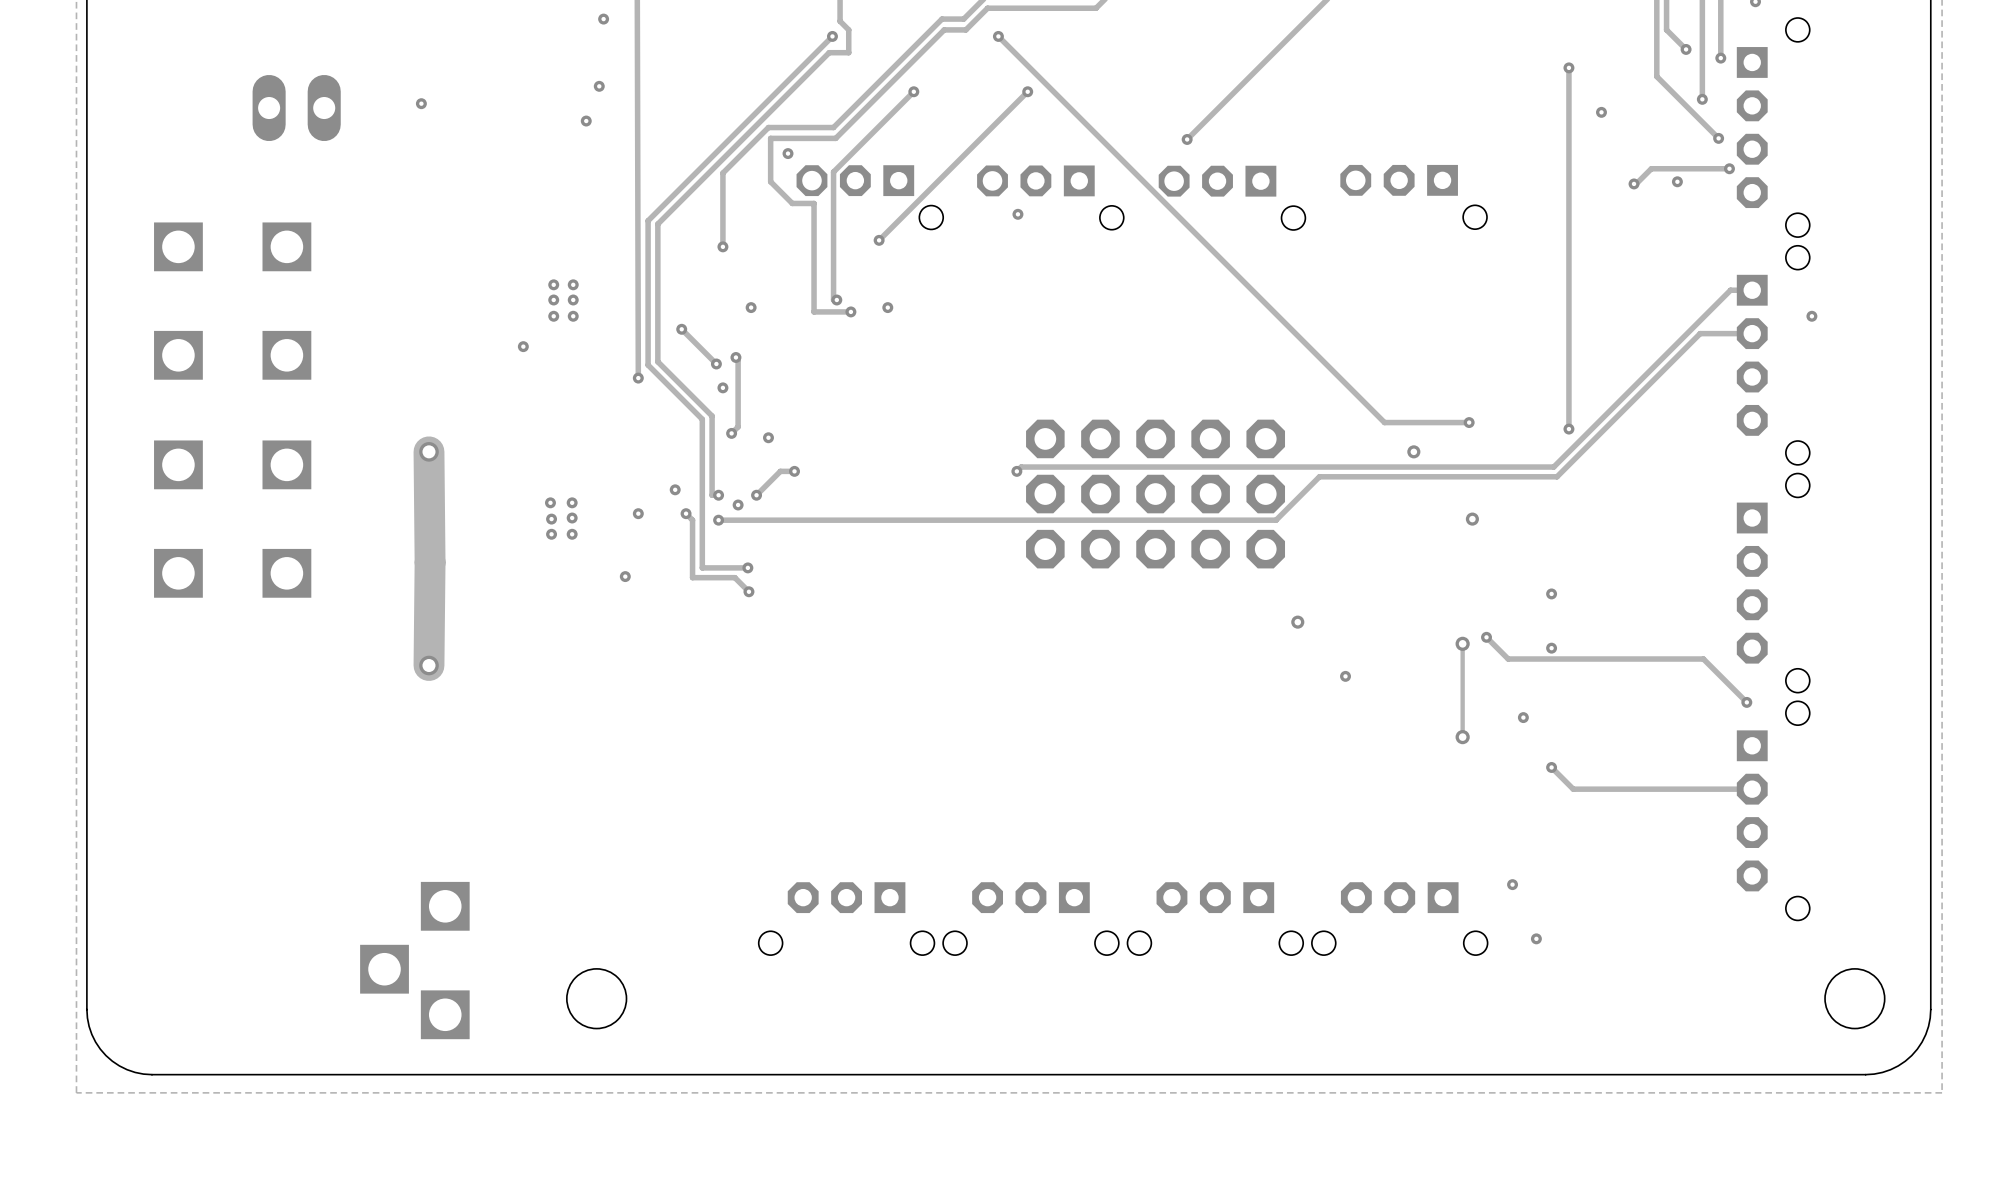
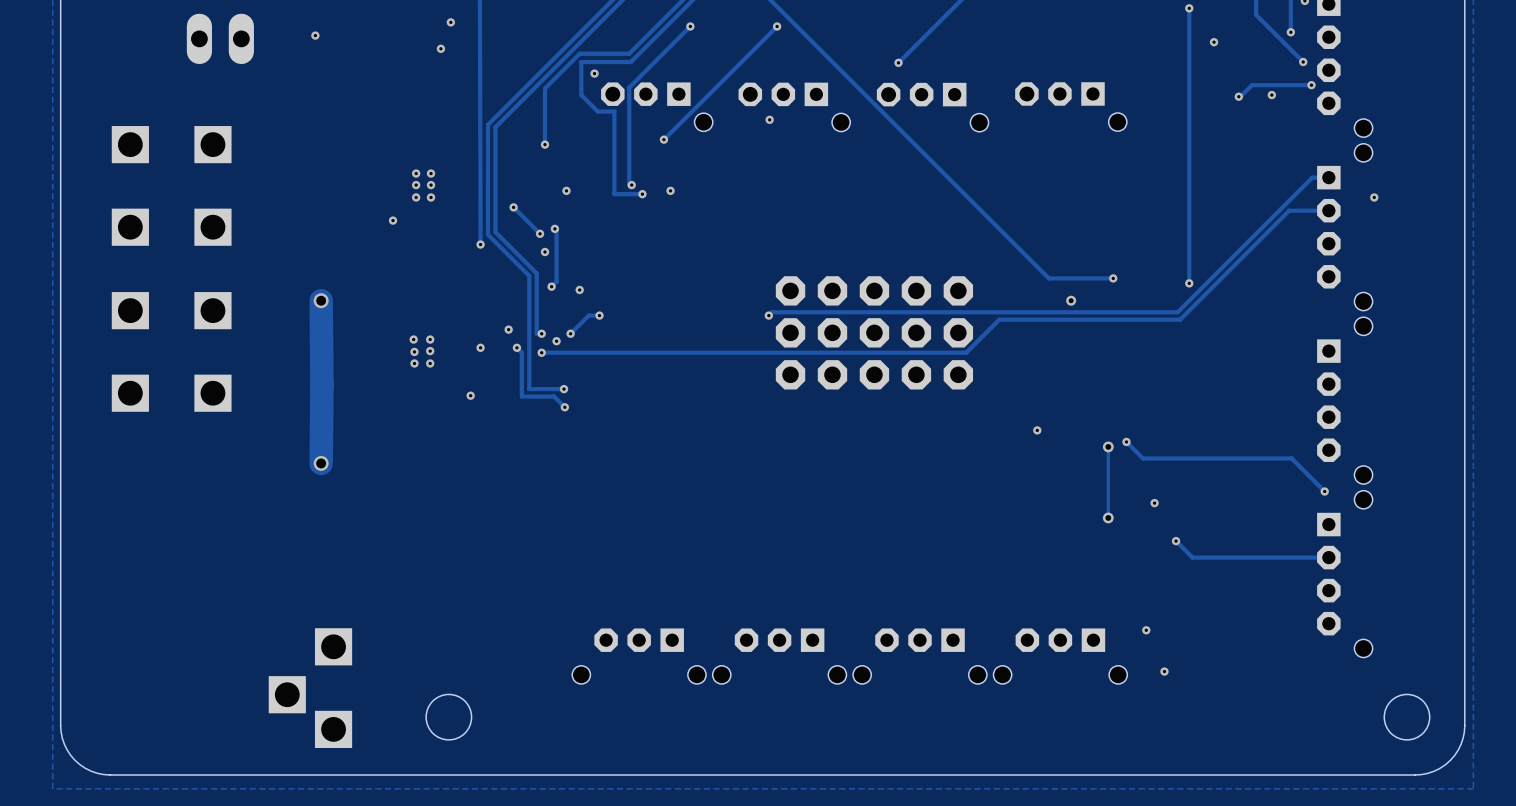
via: (1472, 519) -> none
via: (1551, 593) -> none
via: (1297, 622) -> none
via: (1551, 648) -> none
via position: (1345, 676) -> (1037, 430)

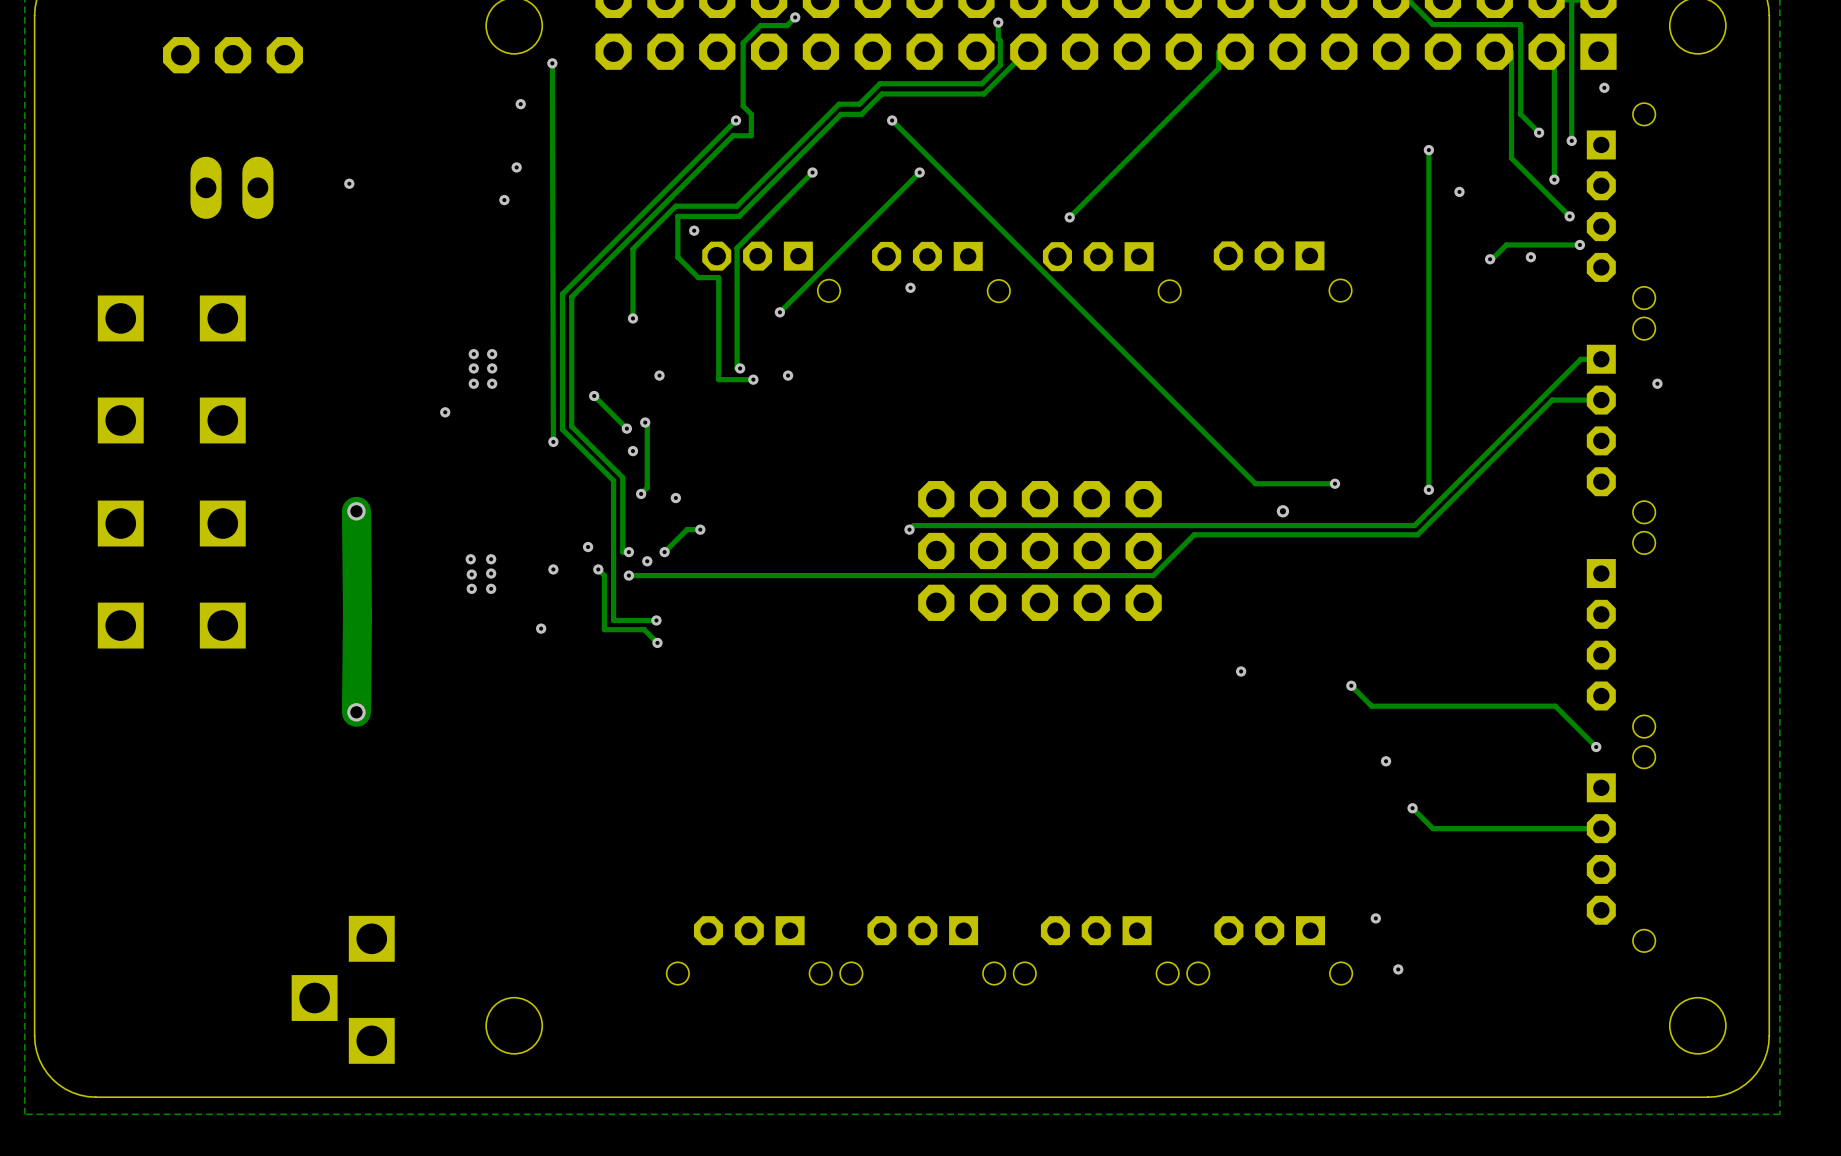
track: (1108, 446) (1108, 517) -> none
via: (1108, 446) -> none
via: (1108, 517) -> none

